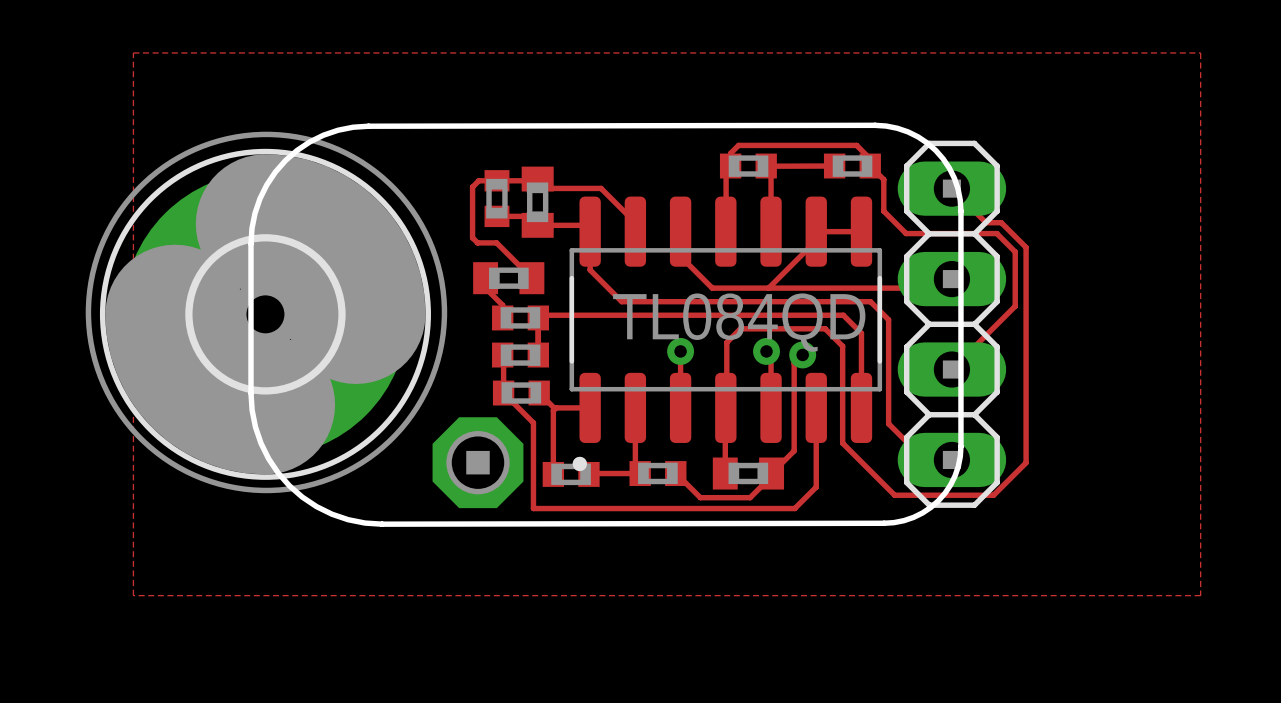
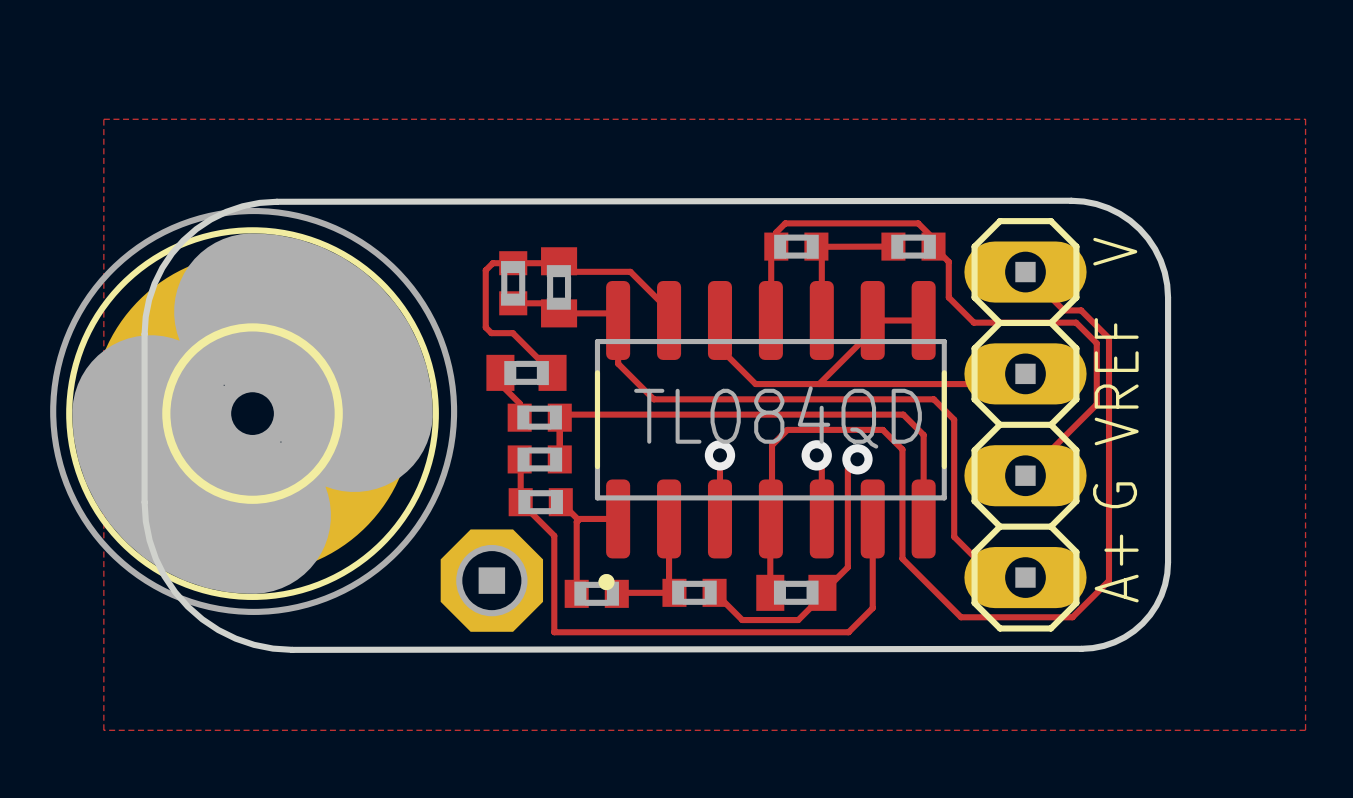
board edge: (875, 125) (368, 126) (338, 130) (309, 141) (285, 160) (275, 172) (259, 198) (251, 228) (252, 410) (255, 426) (268, 458) (289, 485) (316, 506) (348, 519) (365, 523) (884, 523) (903, 520) (922, 512) (938, 500) (950, 484) (960, 456) (960, 200) (949, 168) (927, 143) (897, 128) (875, 125) -> (1071, 200) (276, 201) (259, 202) (226, 211) (196, 229) (183, 240) (162, 267) (149, 299) (144, 334) (144, 502) (149, 540) (155, 558) (175, 592) (202, 619) (235, 638) (272, 648) (1081, 648) (1114, 642) (1134, 630) (1150, 614) (1161, 595) (1167, 573) (1167, 284) (1164, 272) (1155, 249) (1148, 238) (1130, 220) (1119, 213) (1096, 204) (1071, 200)
text: none -> V (1115, 251)
text: none -> VREF (1116, 381)
text: none -> G (1115, 495)
text: none -> A+ (1116, 568)

